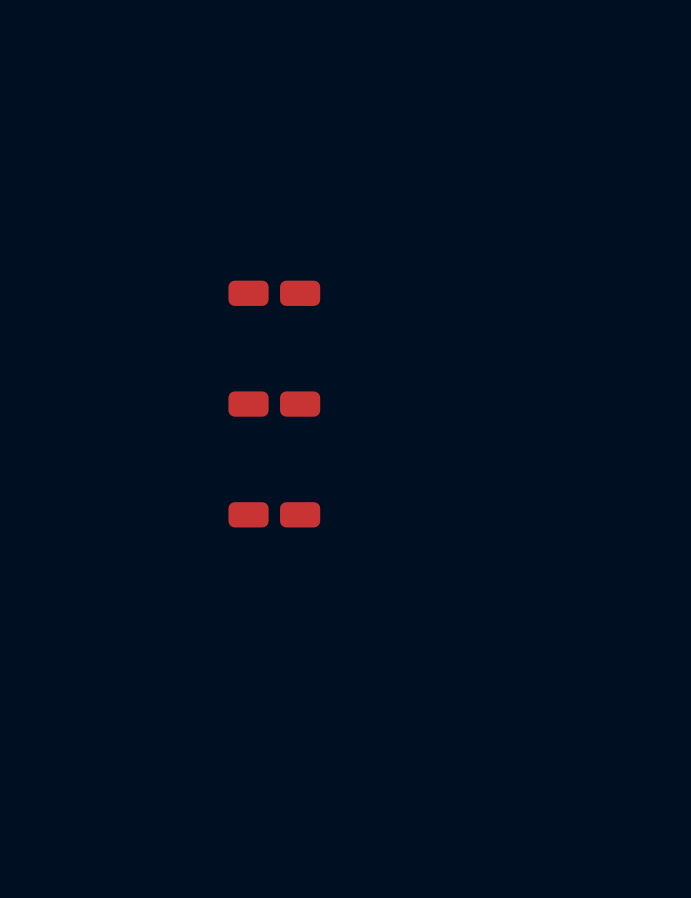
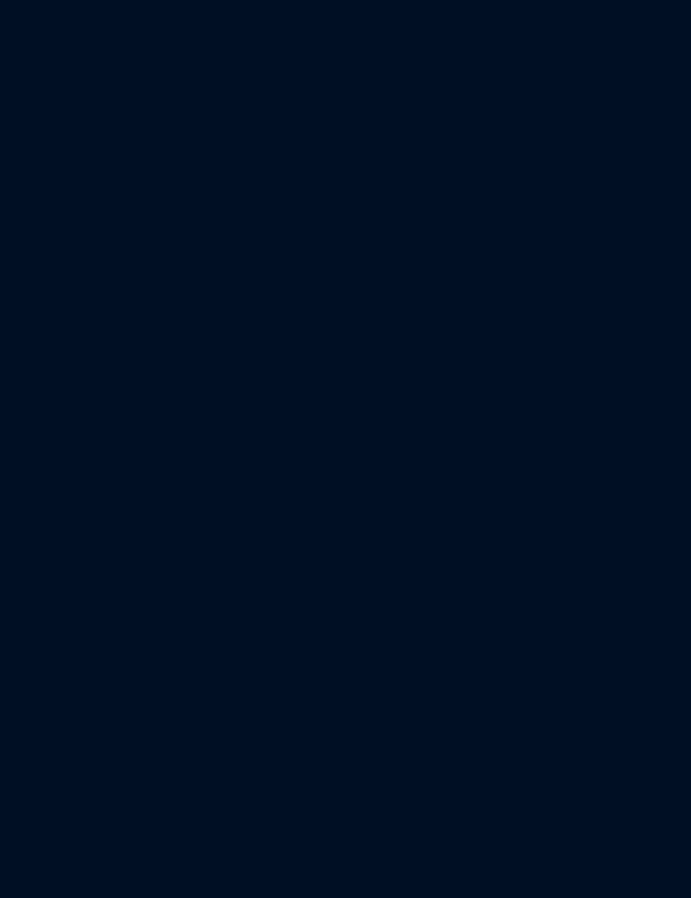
part: (274, 293) -> none
part: (274, 404) -> none
part: (274, 514) -> none

